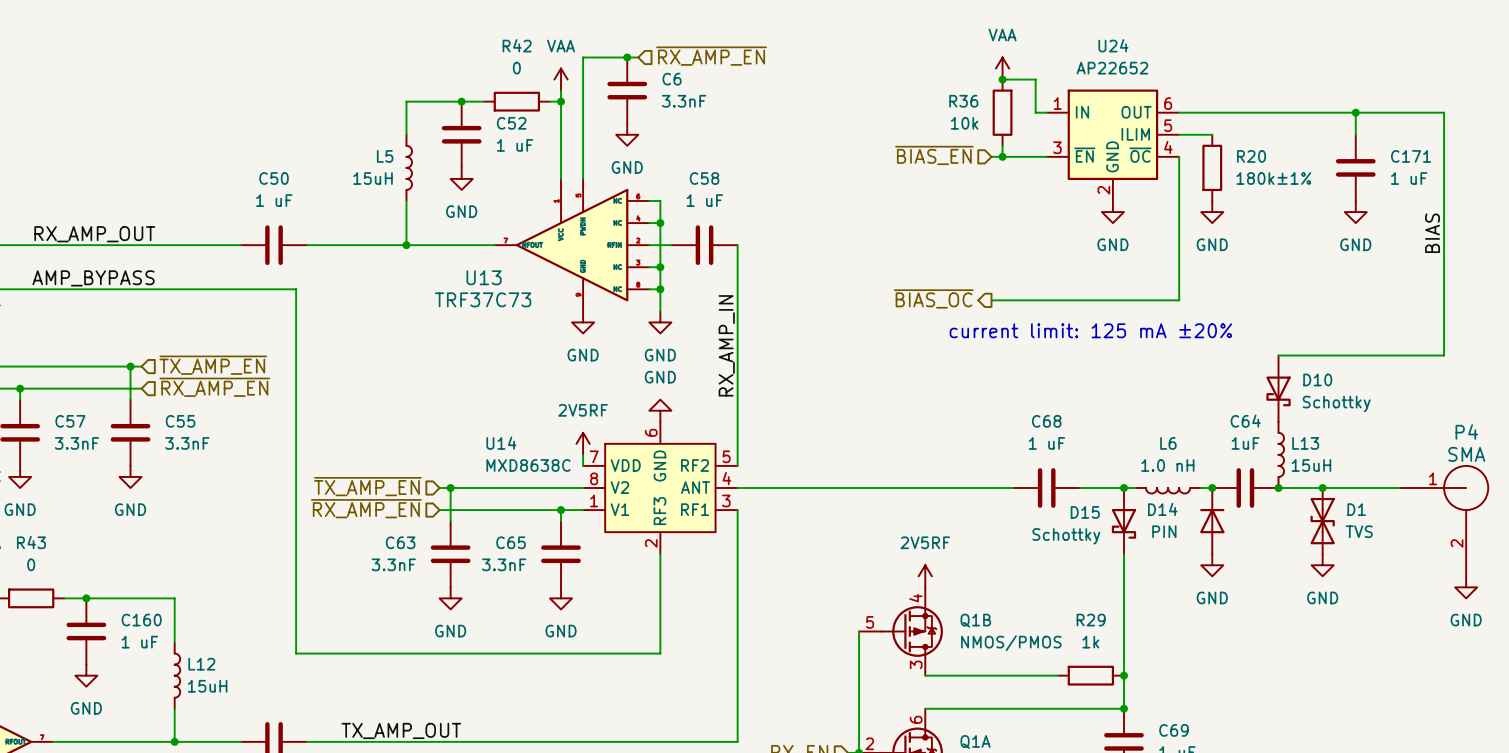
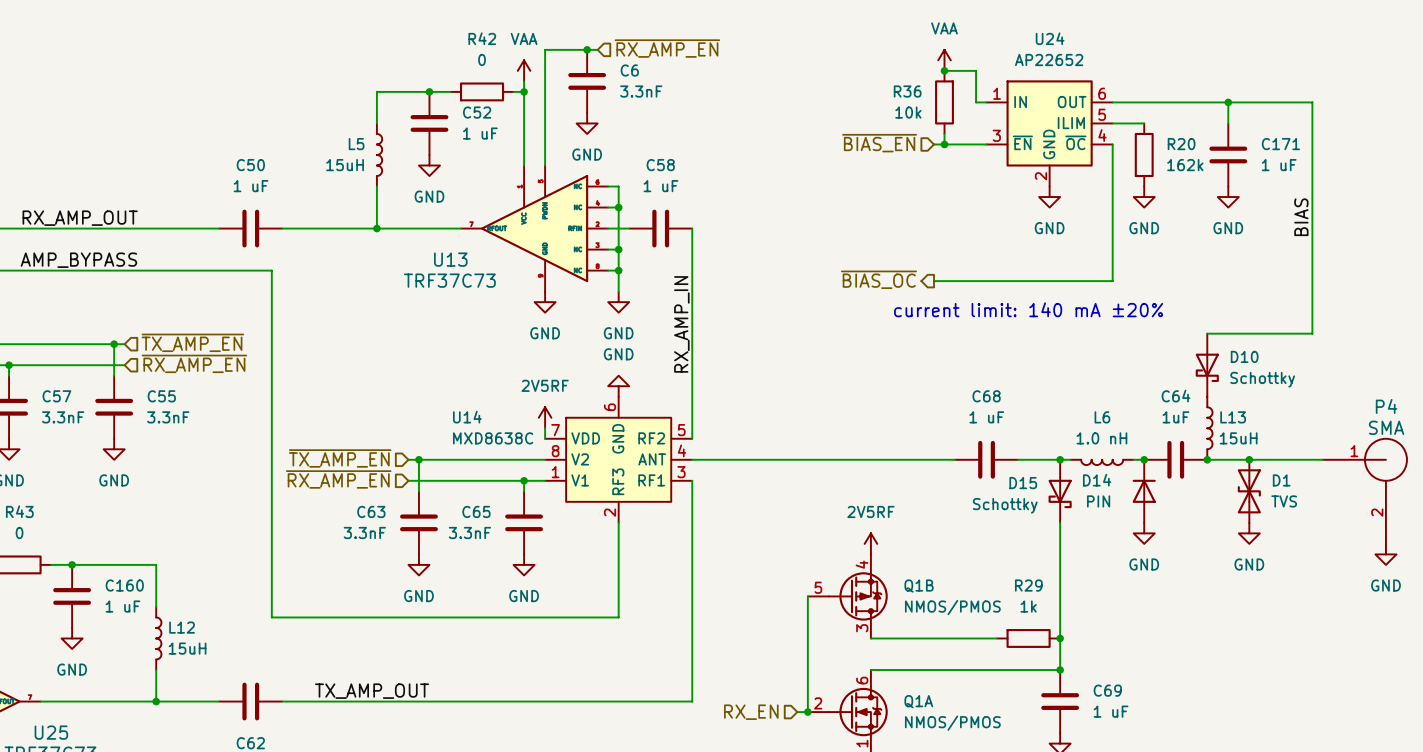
junction: none -> (1228, 102)
wire: (1355, 112) (1355, 134) -> (1228, 102) (1228, 123)
junction: (1355, 112) -> none
wire: (1388, 112) (1444, 112) (1444, 355) (1388, 355) -> (1312, 102) (1312, 333)
C171 position: (1355, 167) -> (1228, 154)
R20 value: 180k±1% (1273, 178) -> 162k (1185, 165)
power symbol position: GND (1355, 212) -> GND (1228, 197)
label position: BIAS (1432, 233) -> BIAS (1301, 217)
text: current limit: 125 mA ±20% (1090, 330) -> current limit: 140 mA ±20% (1028, 309)

